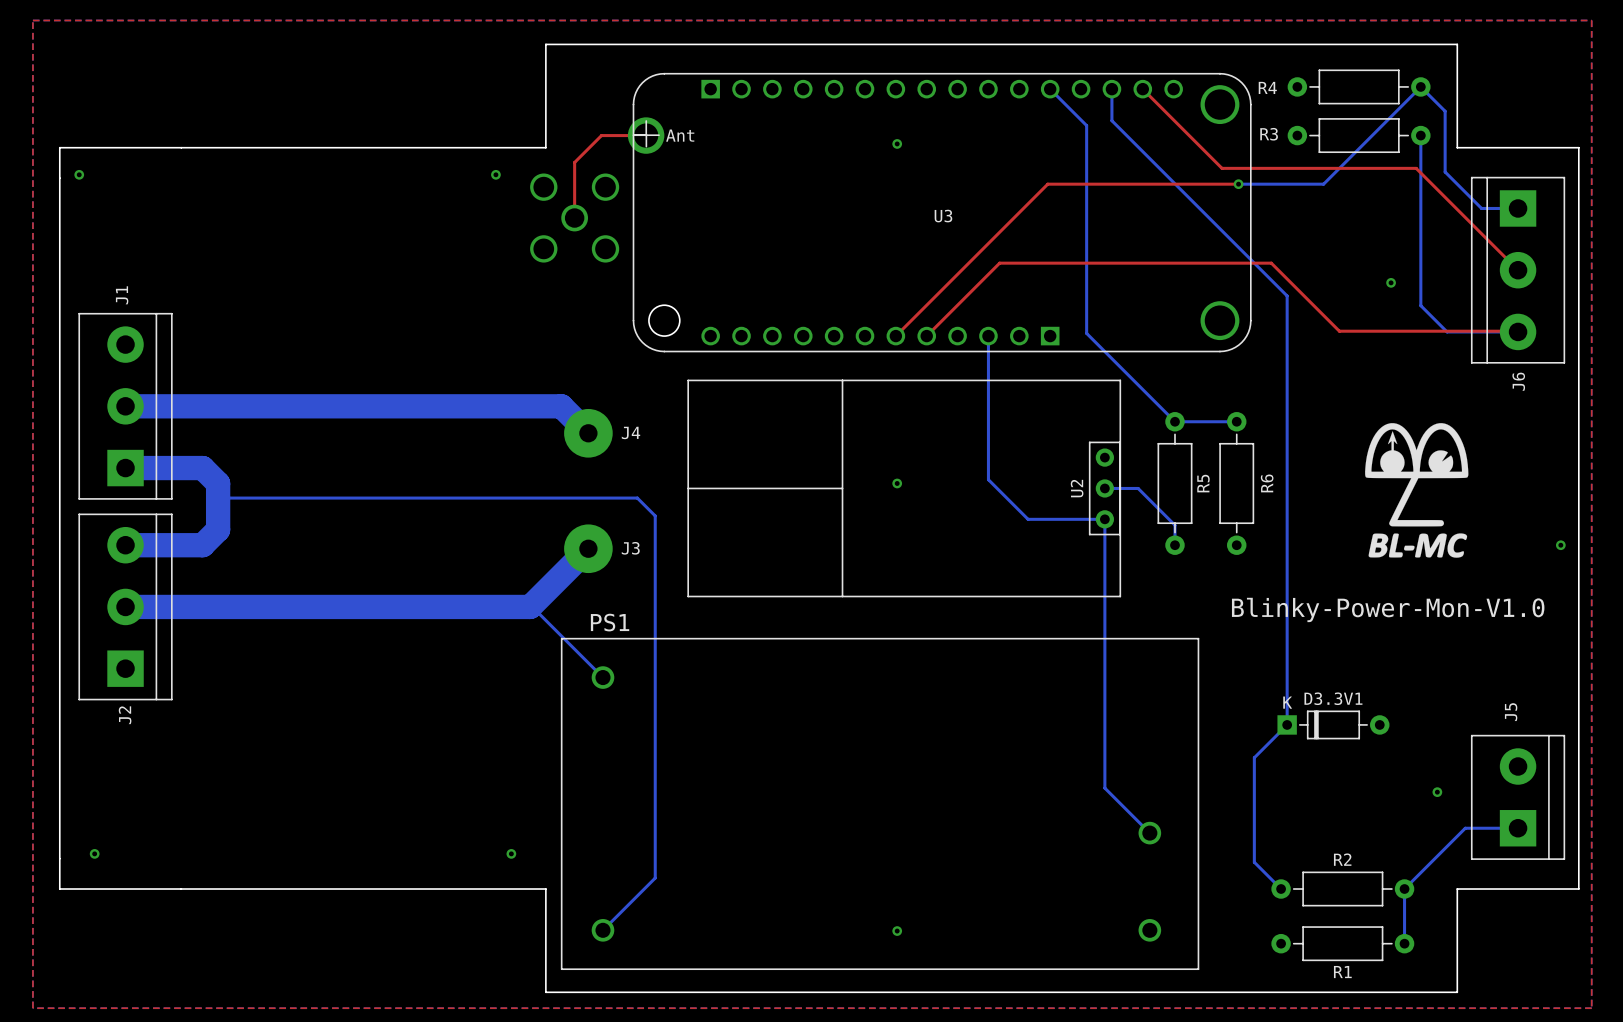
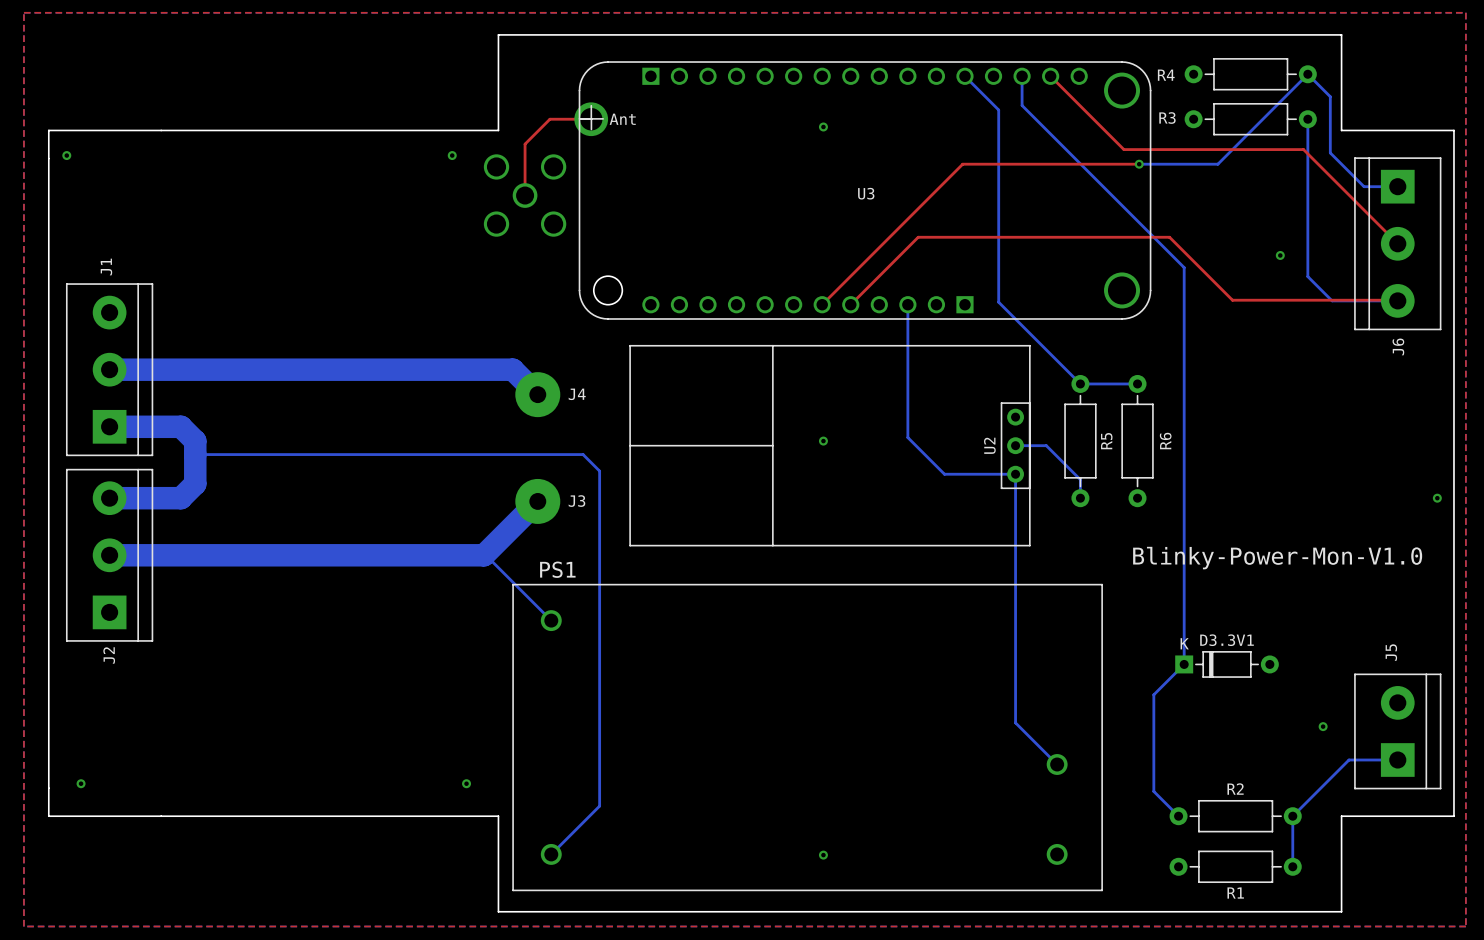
drawing: [1365, 423, 1469, 558] -> none

